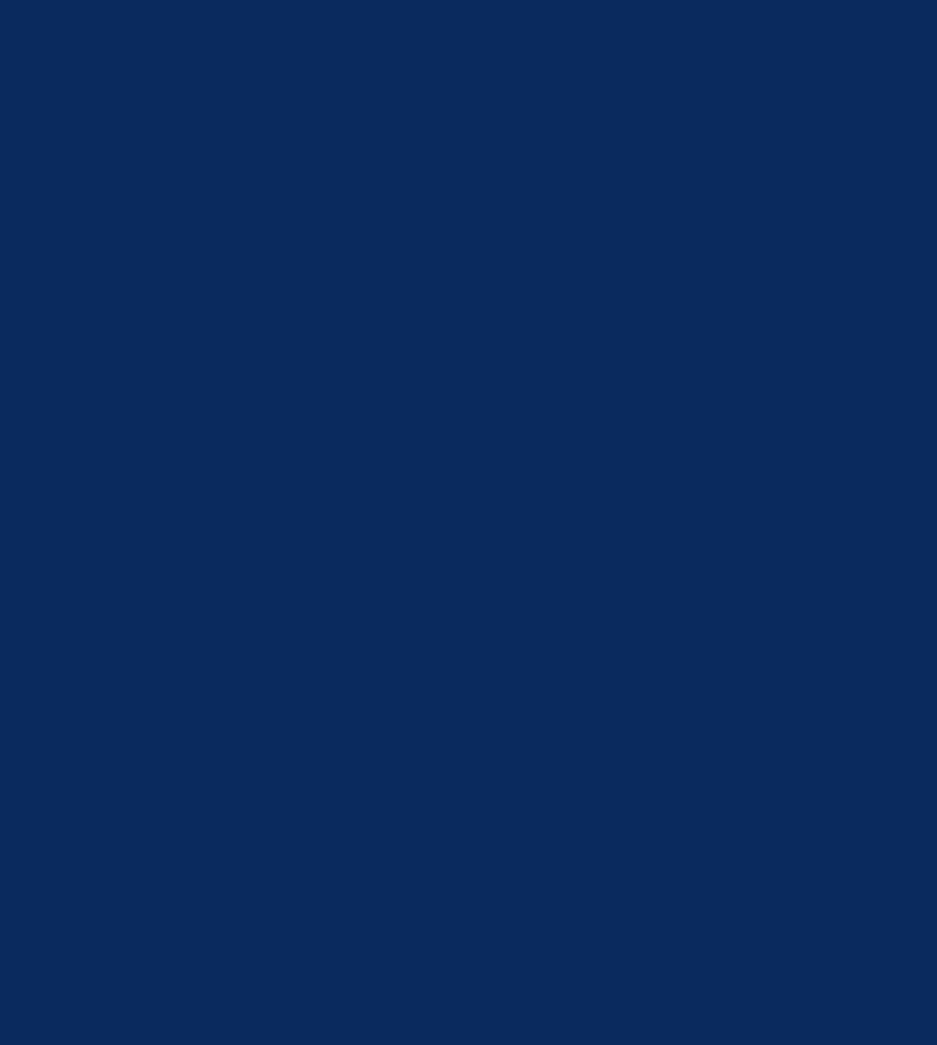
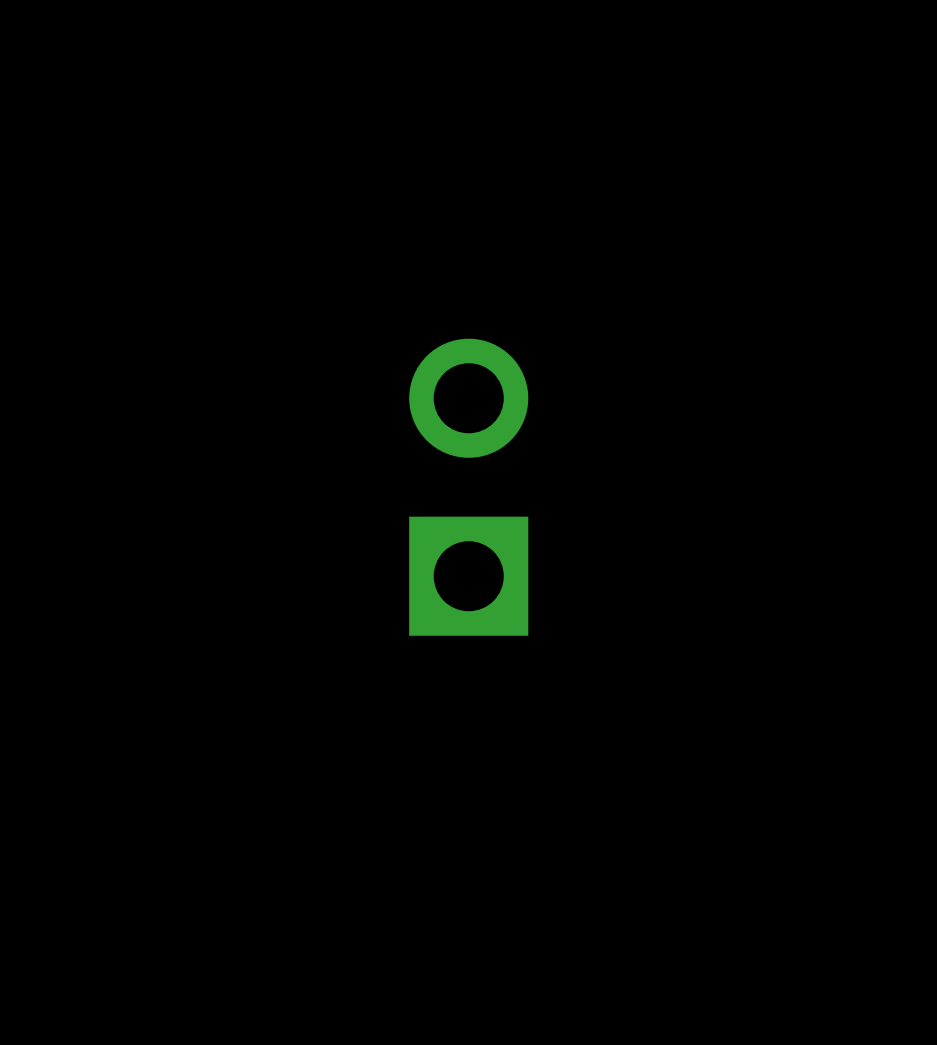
part: none -> (468, 487)

